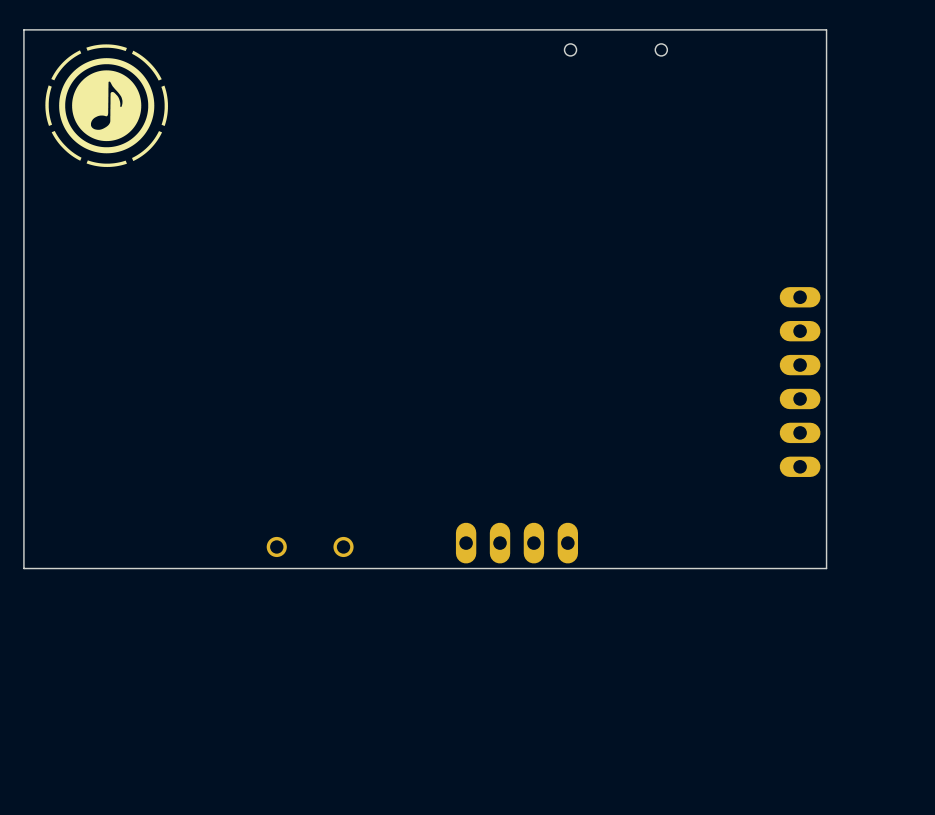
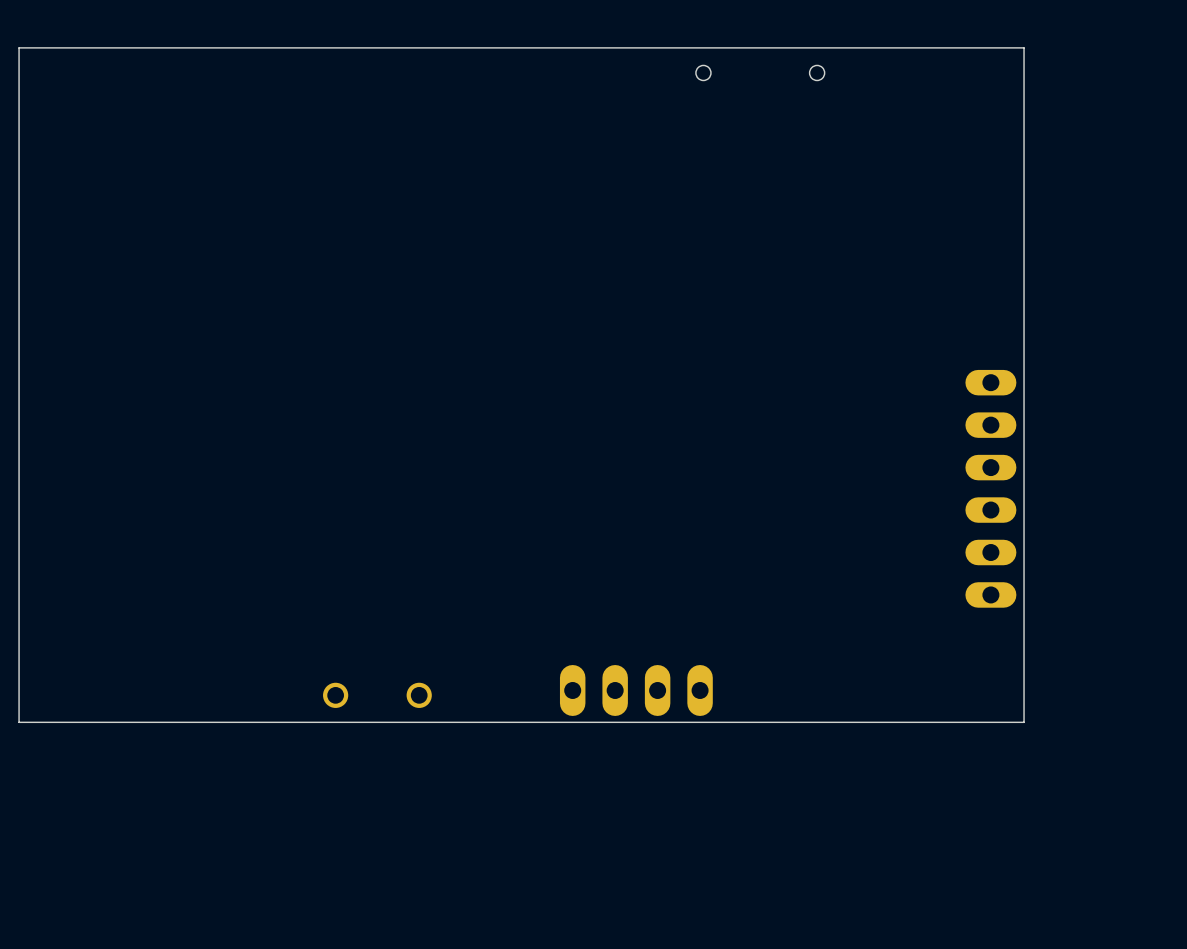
drawing: [45, 44, 169, 168] -> none

